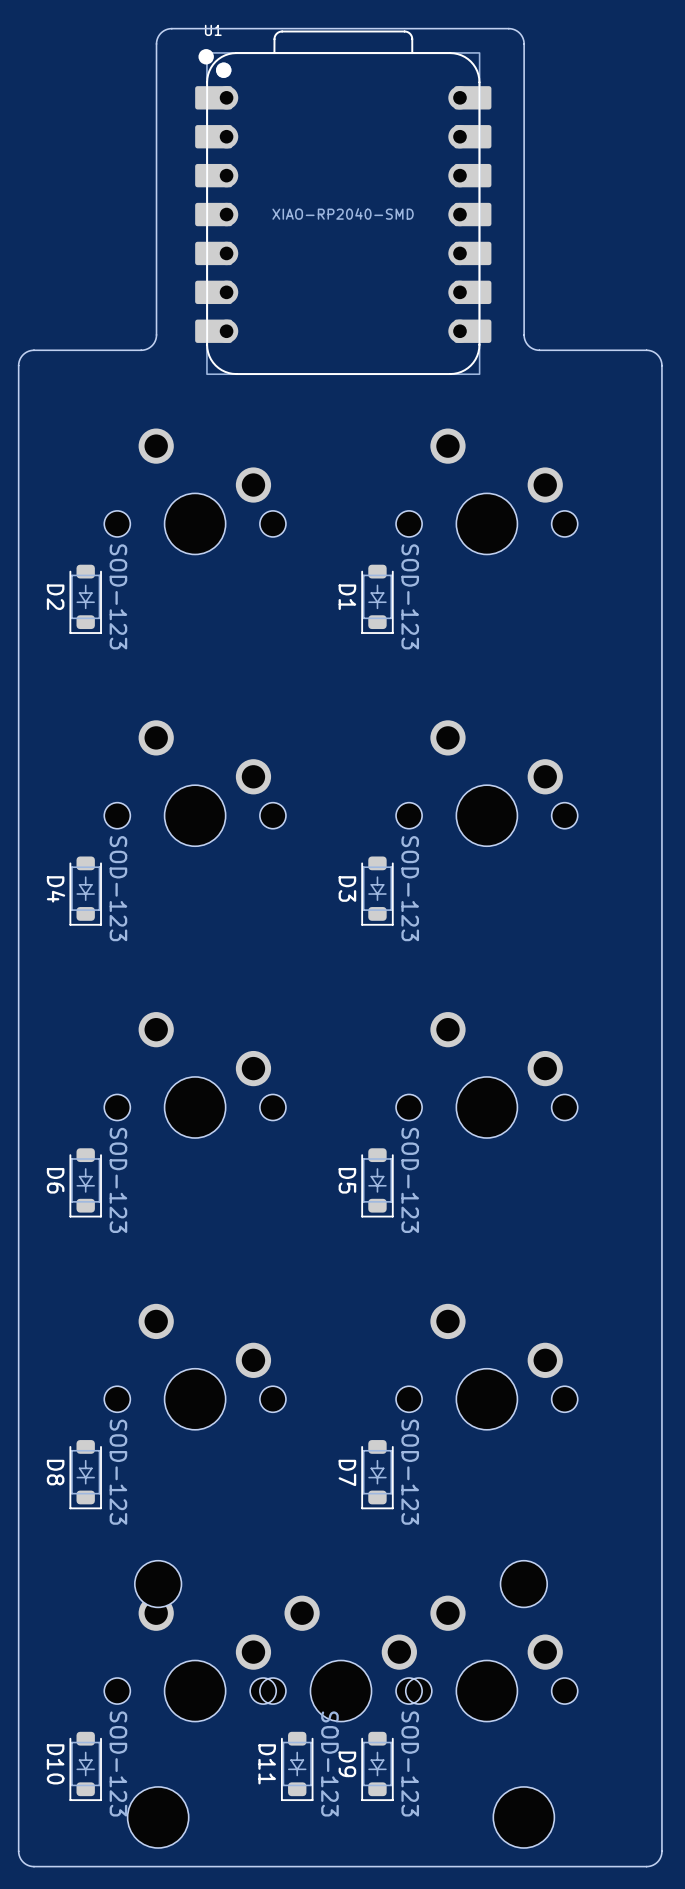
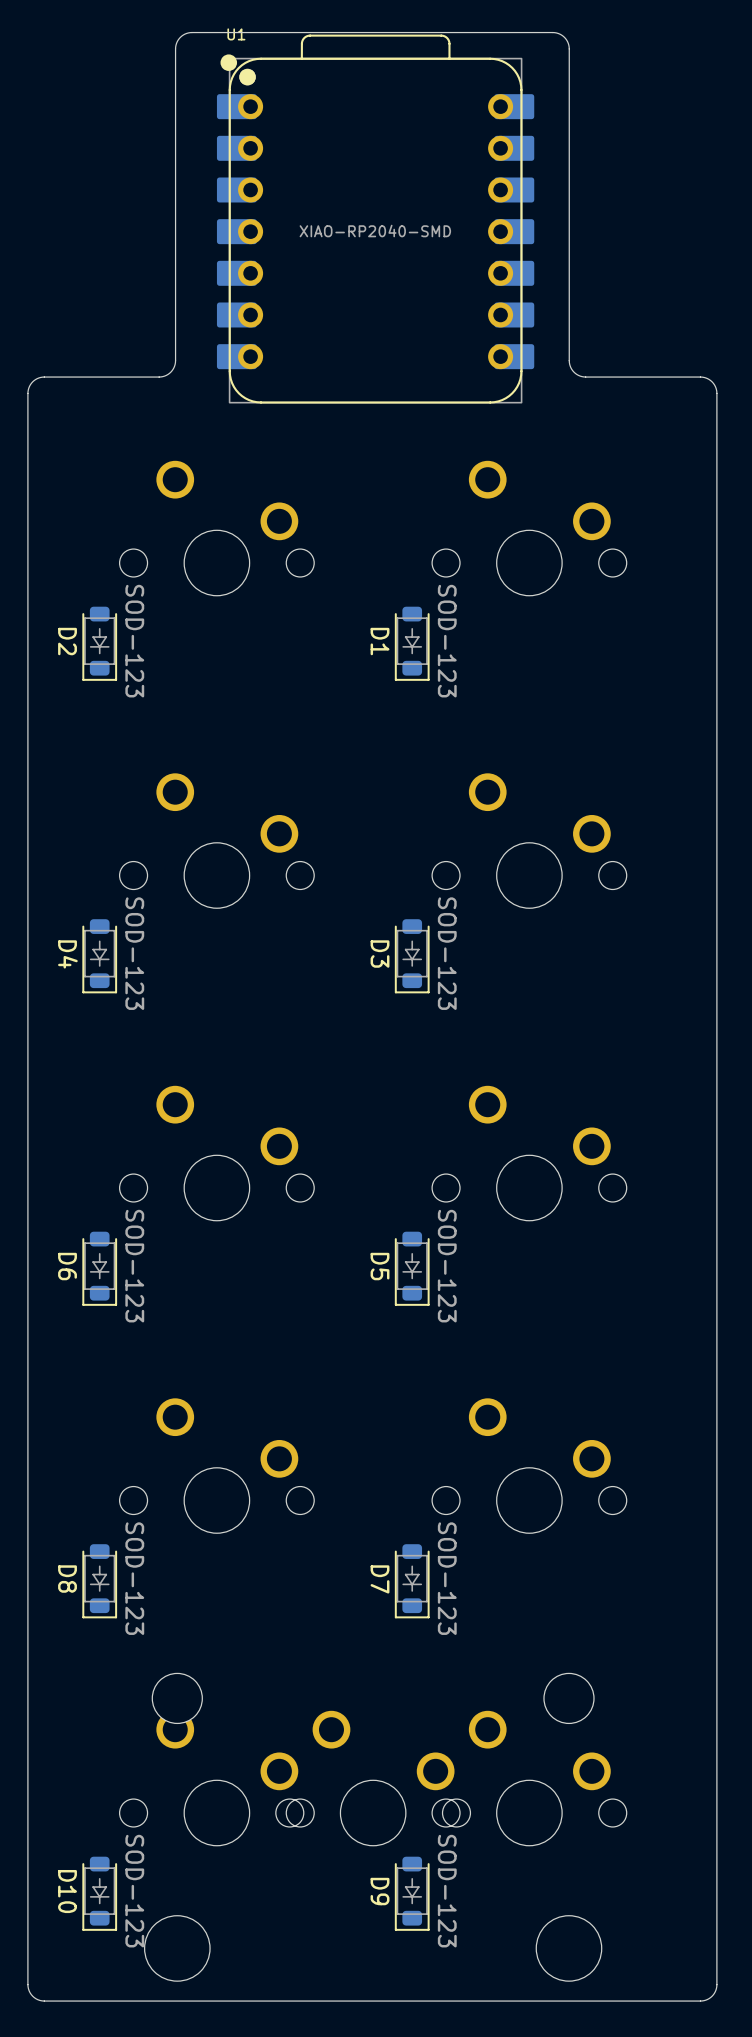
D11: SOD-123 (297, 1766) -> none

